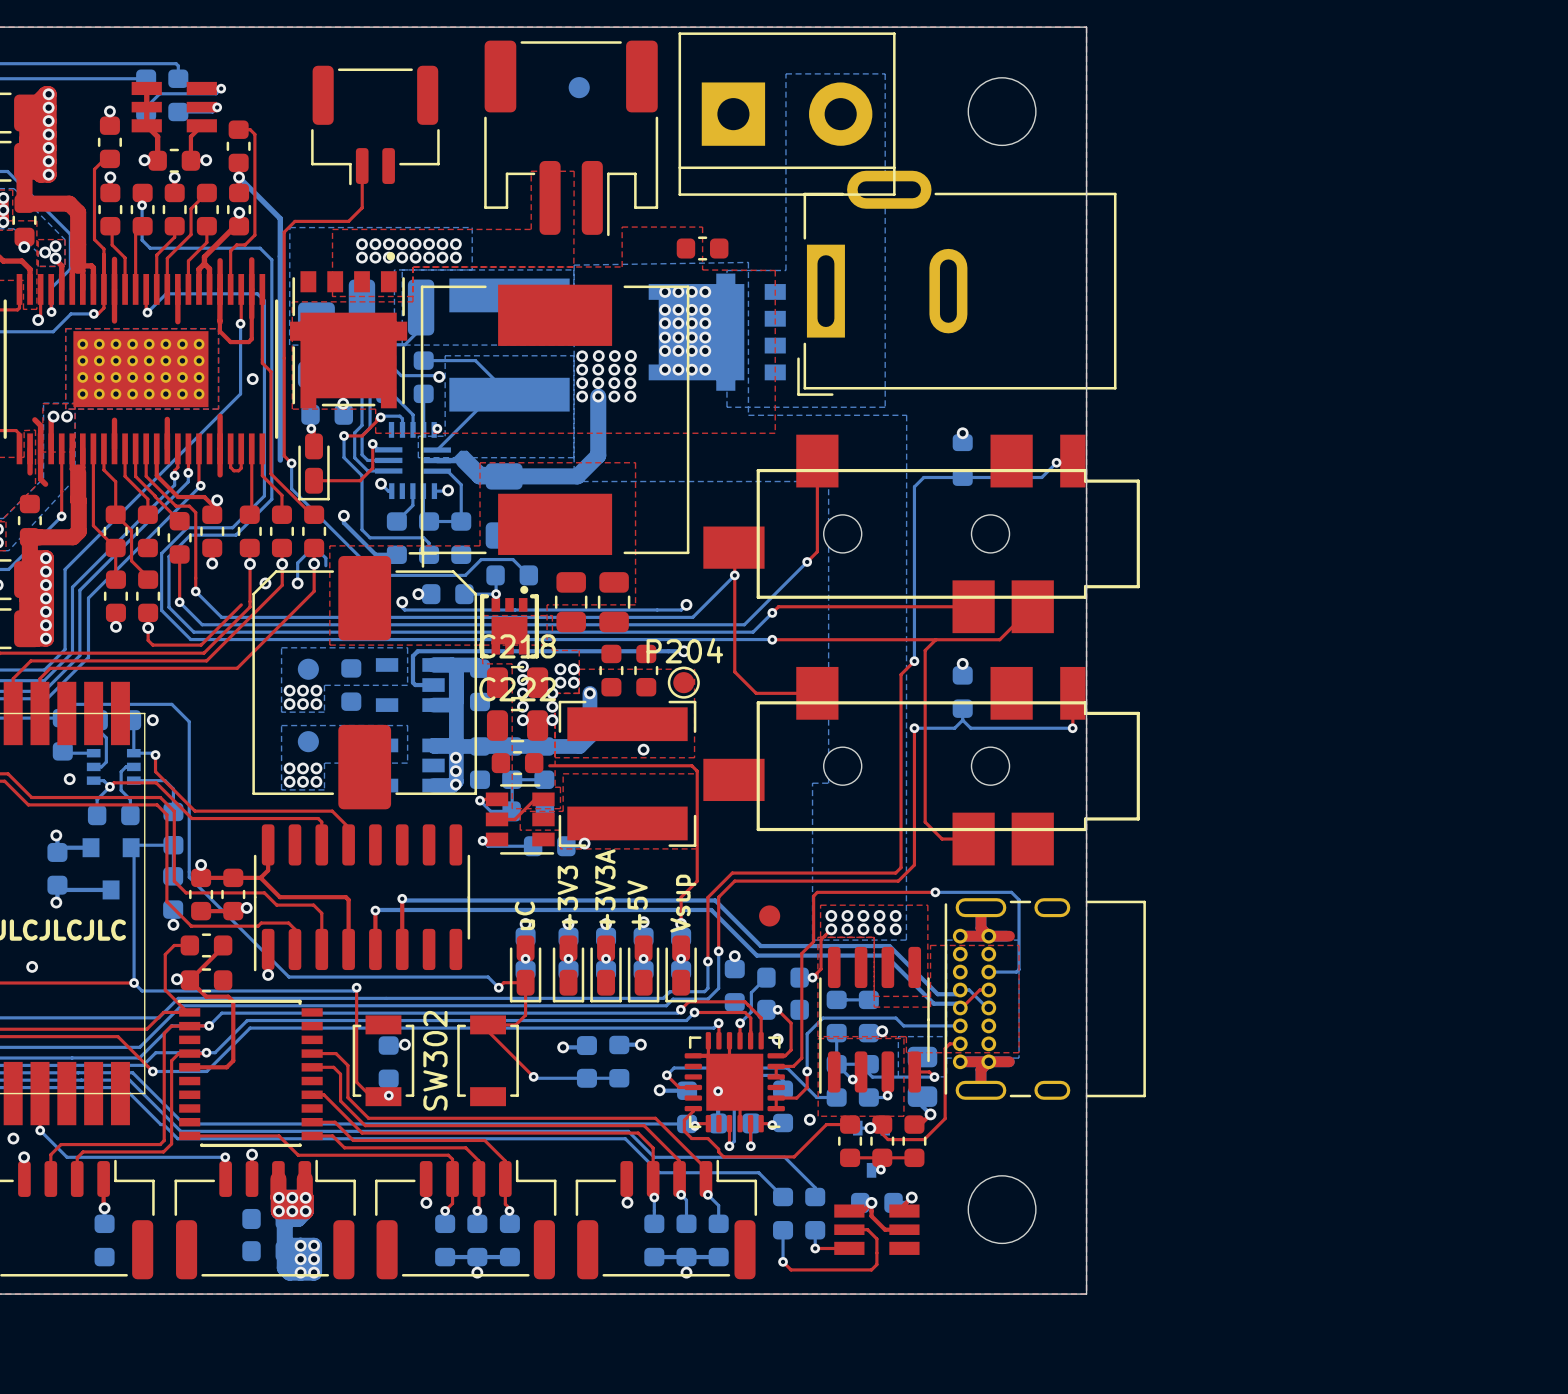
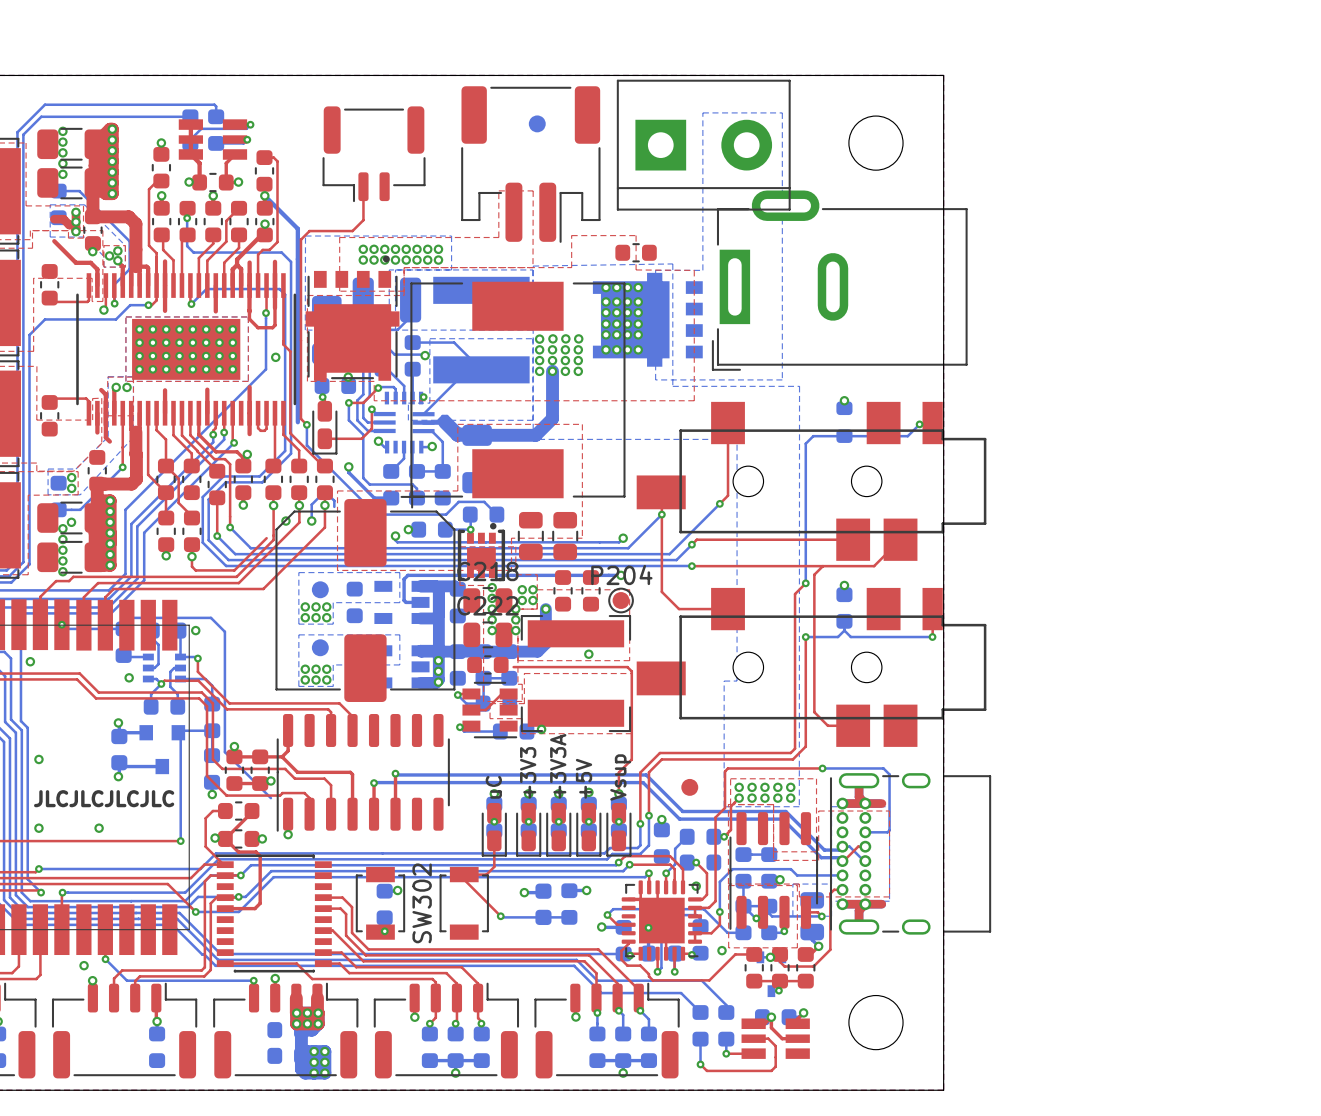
bottom track: (189, 871) (189, 877) (289, 977) (488, 977) (498, 987) -> (224, 752) (270, 798)
via: none -> (262, 838)
top track: (525, 982) (503, 982) (498, 987) -> none
bottom track: (134, 983) (142, 990) (354, 990) (356, 987) -> none
top track: (356, 987) (356, 1082) (371, 1096) (383, 1096) -> none
via: (356, 987) -> none
via: (498, 987) -> none

